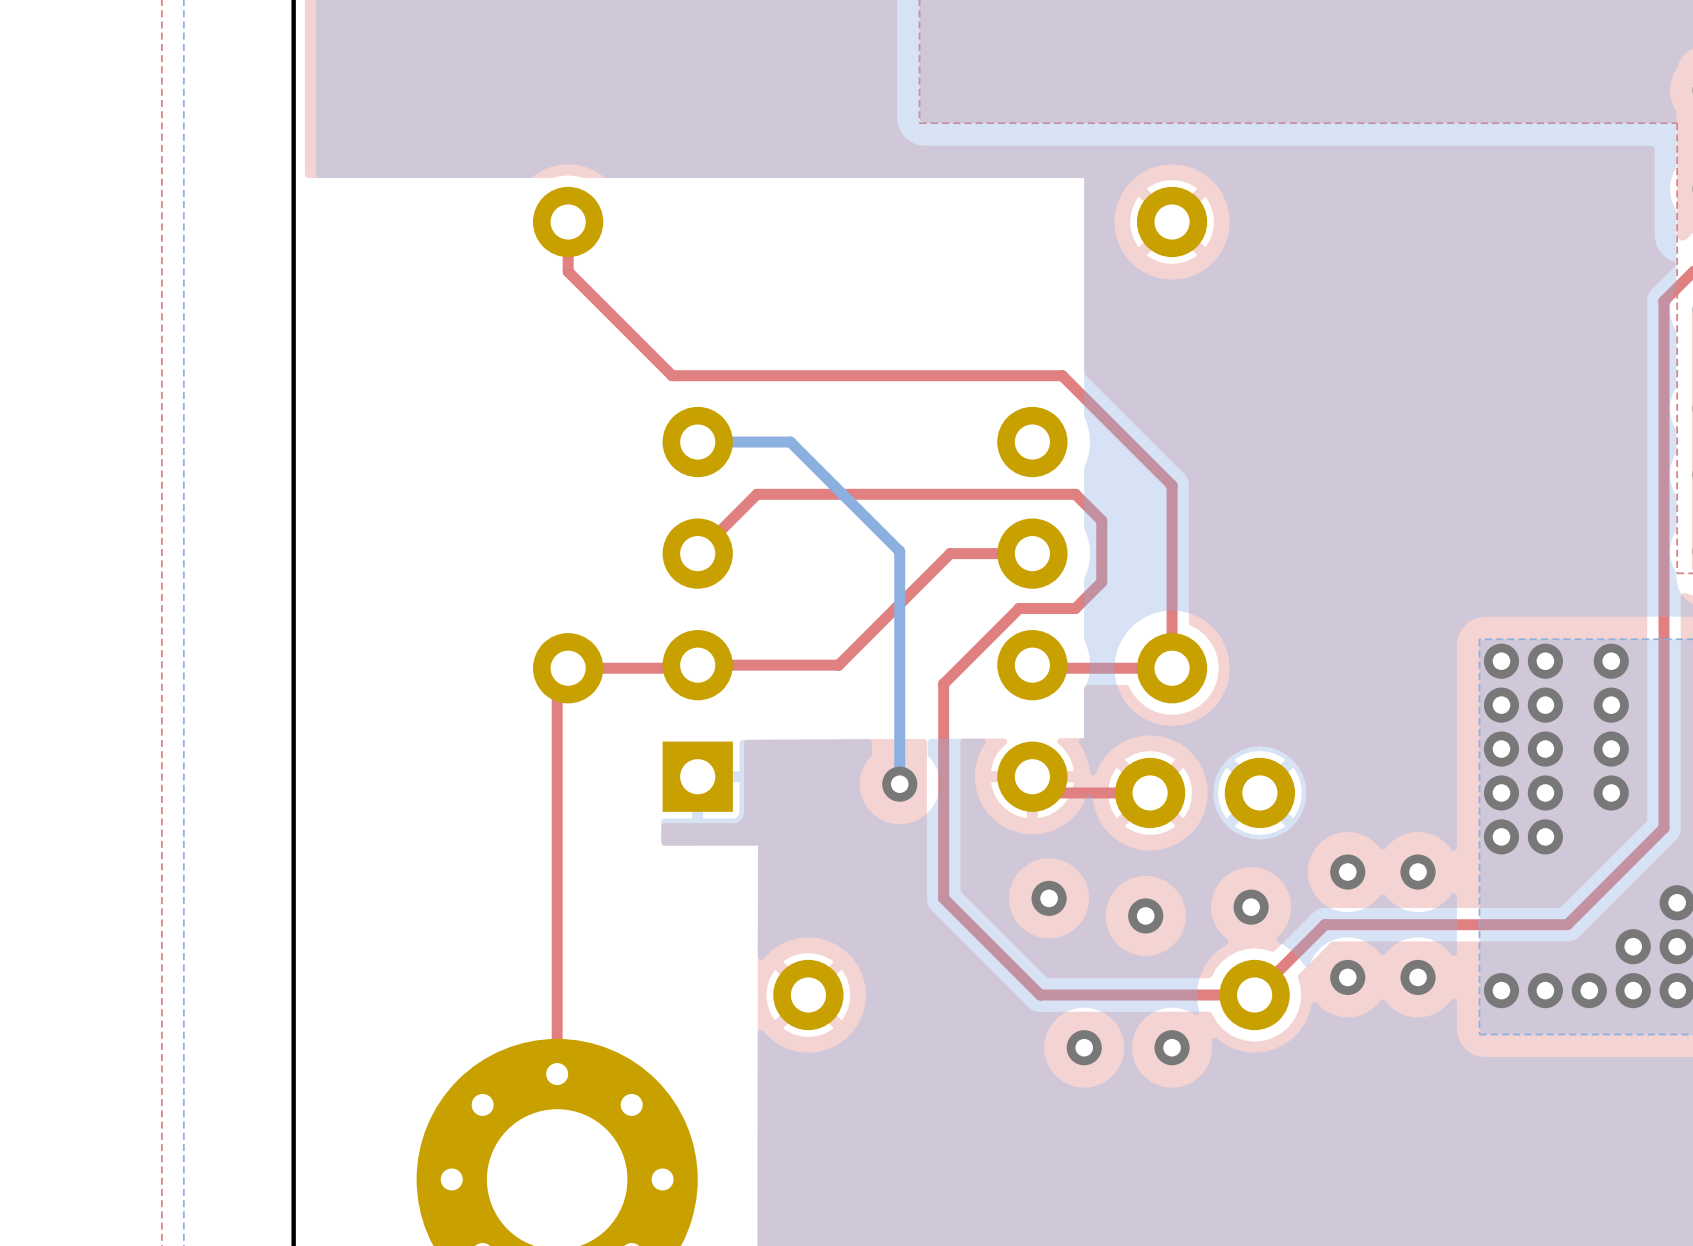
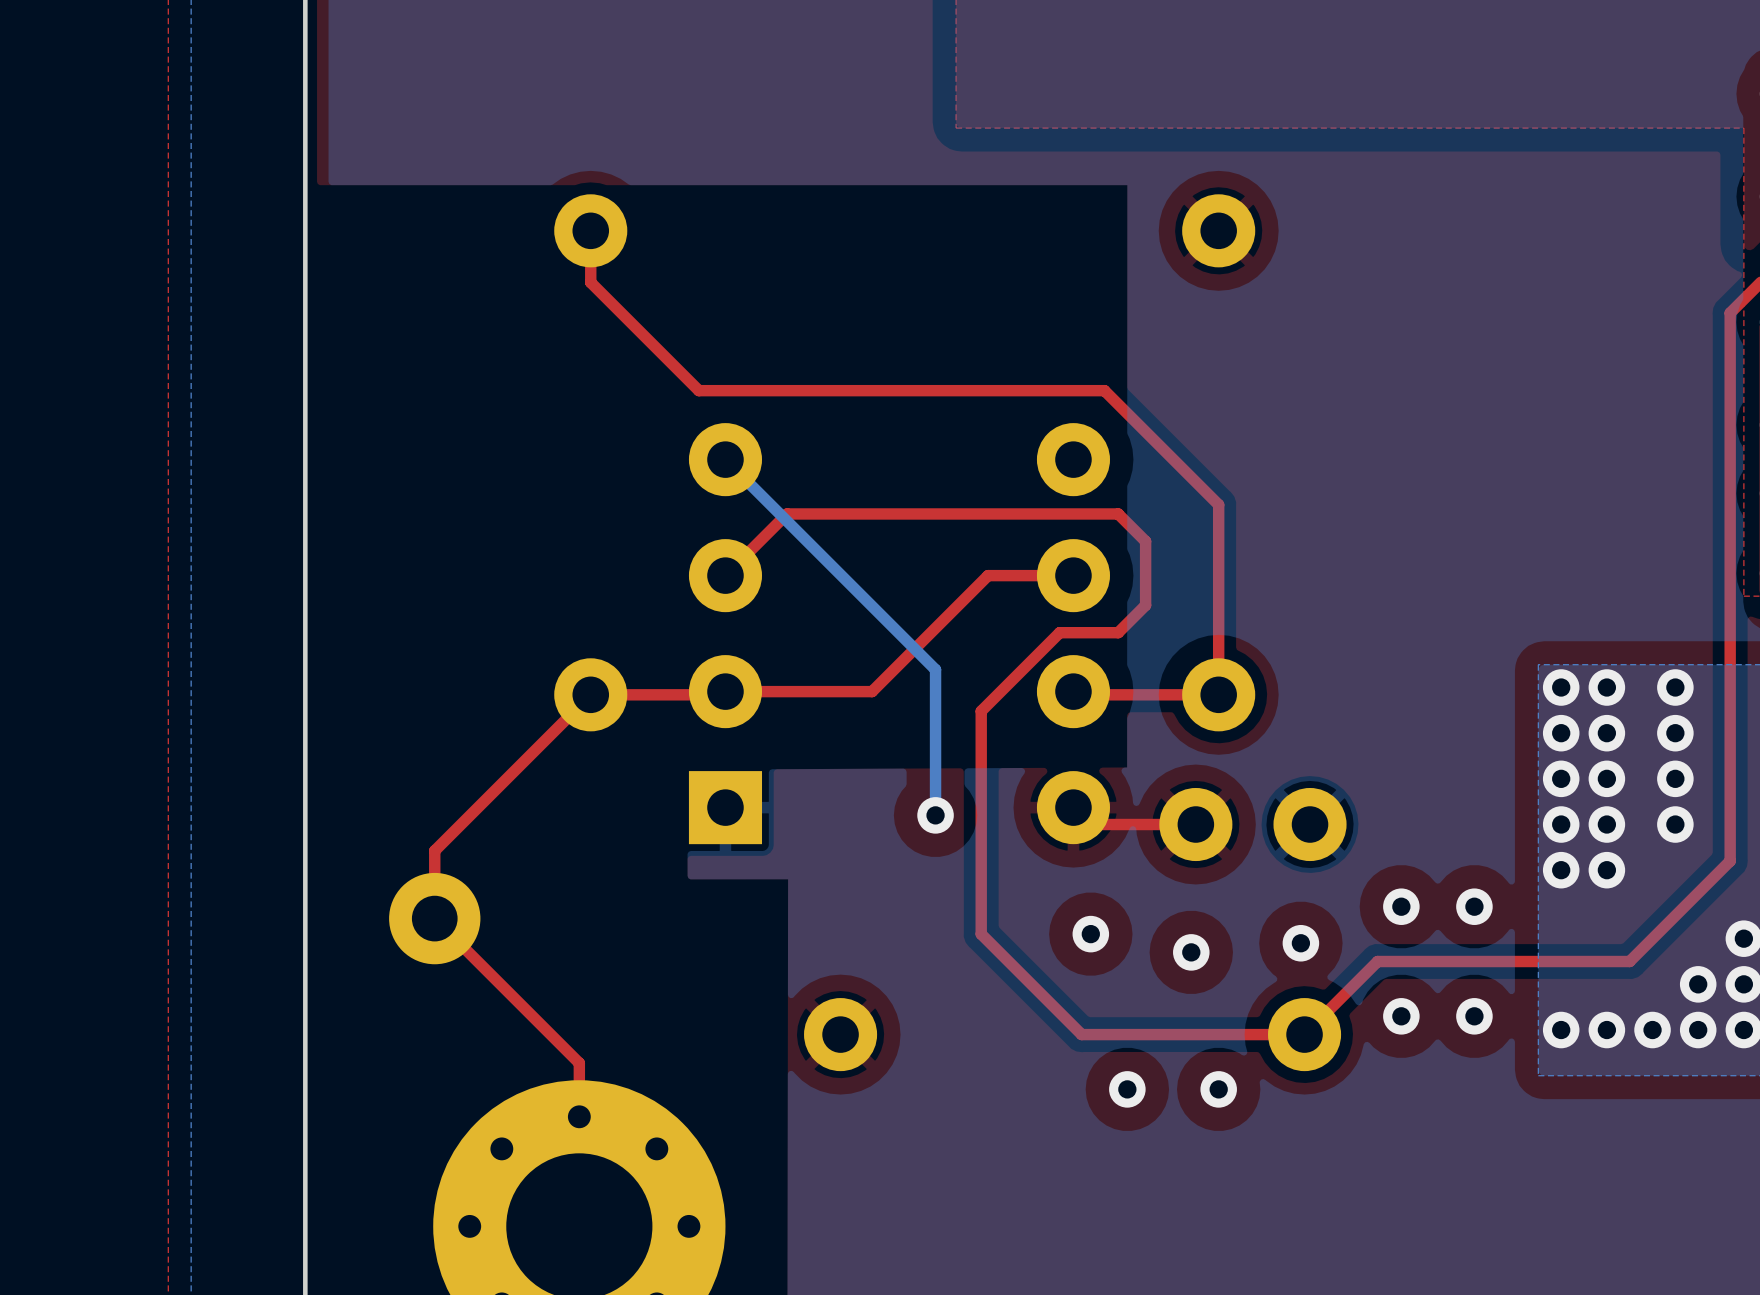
bottom track: (697, 442) (790, 442) (899, 551) (899, 644) -> (725, 459) (935, 669)
top track: (557, 679) (557, 1022) -> (579, 706) (434, 850) (434, 918) (579, 1063)
part: none -> (434, 918)

